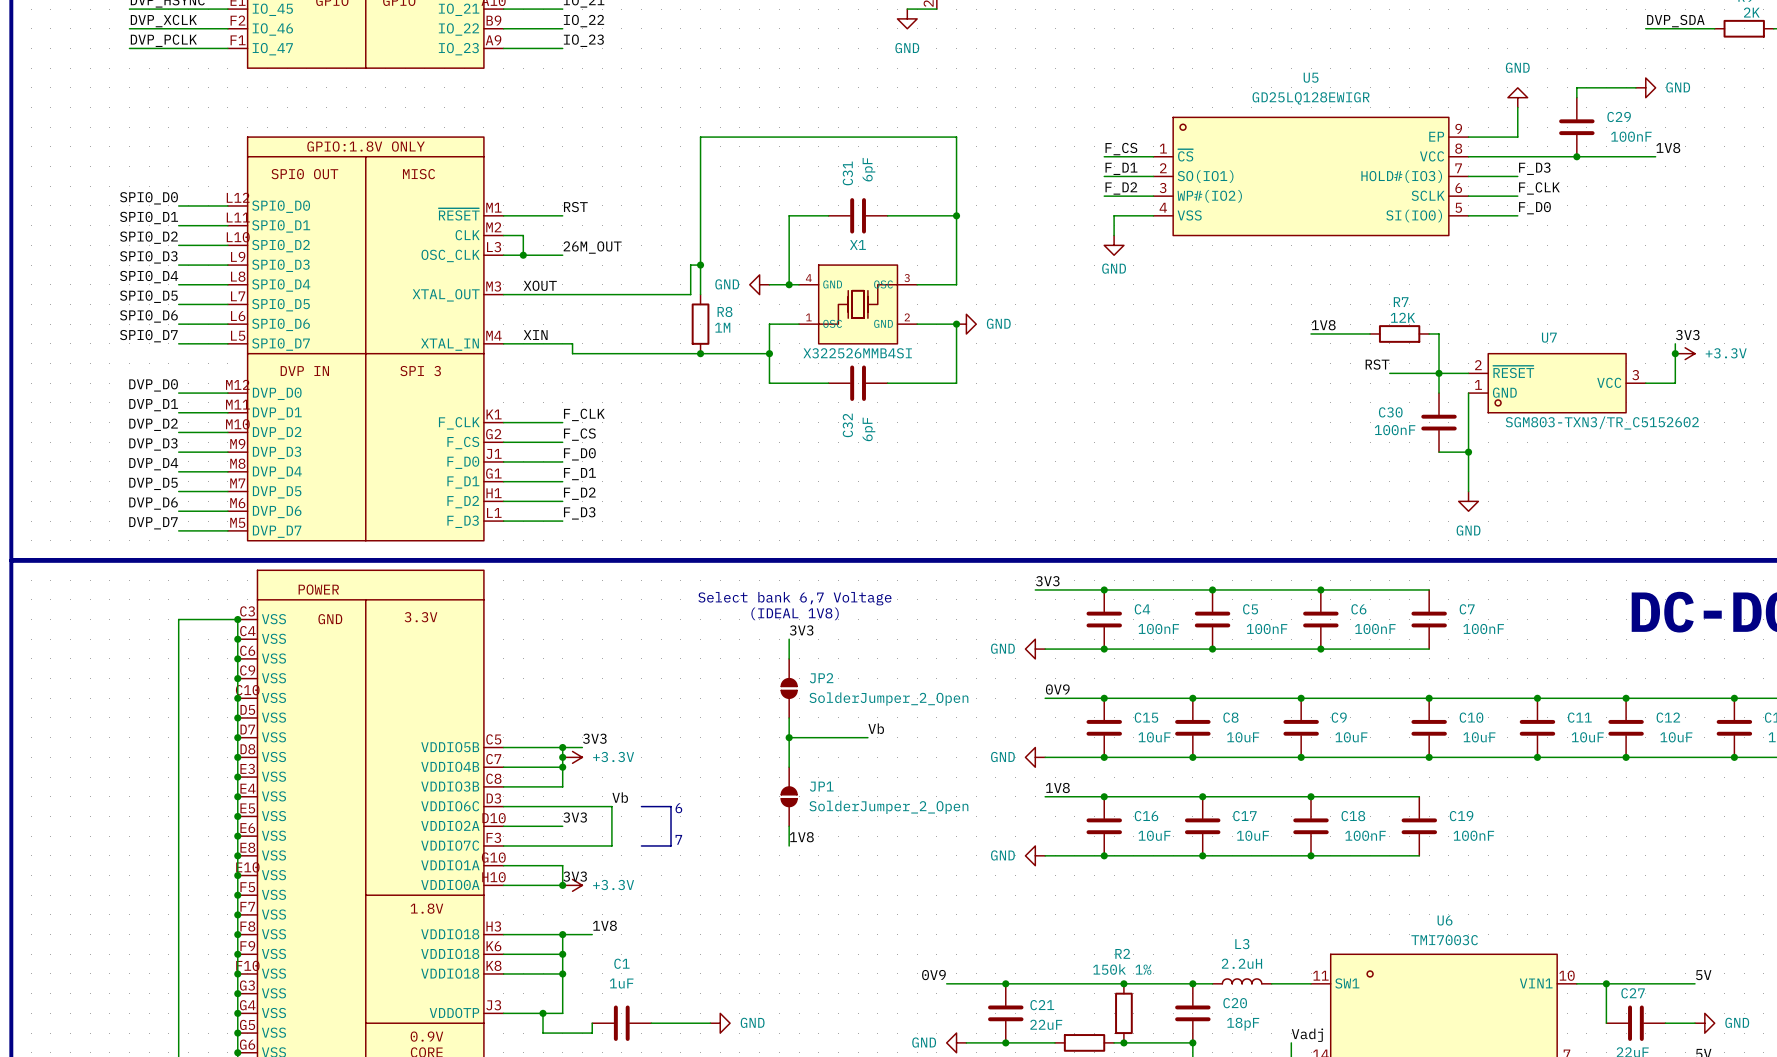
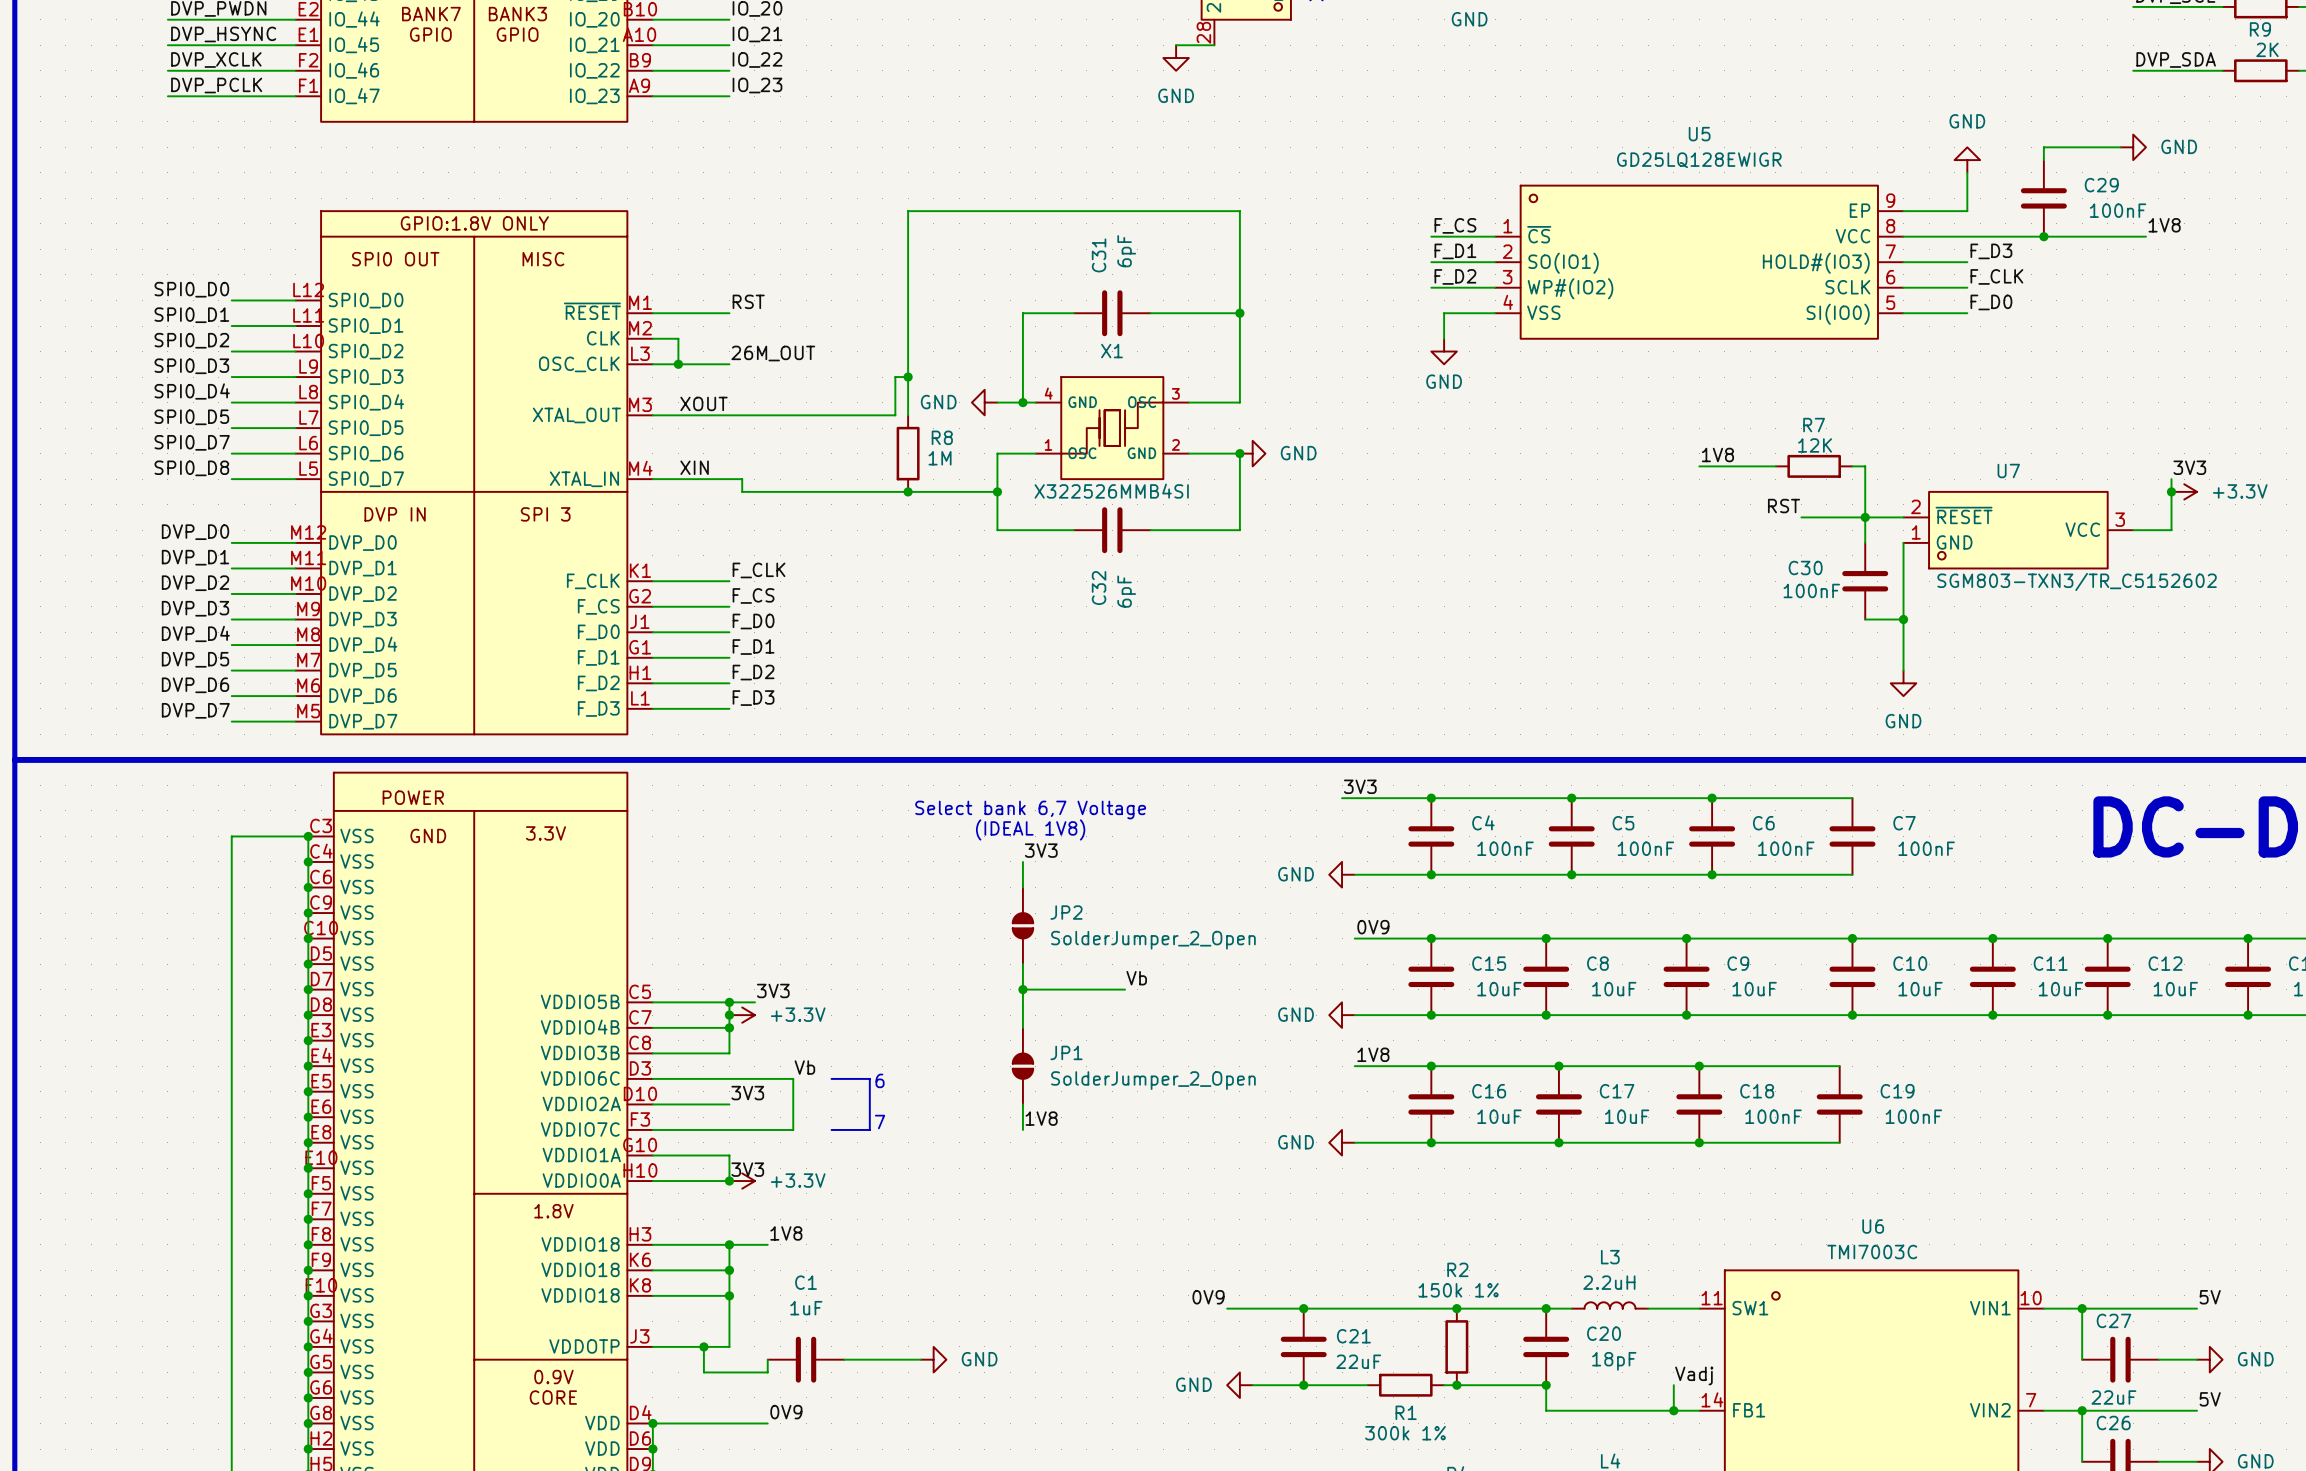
label: SPI0_D6 (148, 316) -> SPI0_D7 (192, 442)
label: SPI0_D7 (148, 336) -> SPI0_D8 (191, 468)

